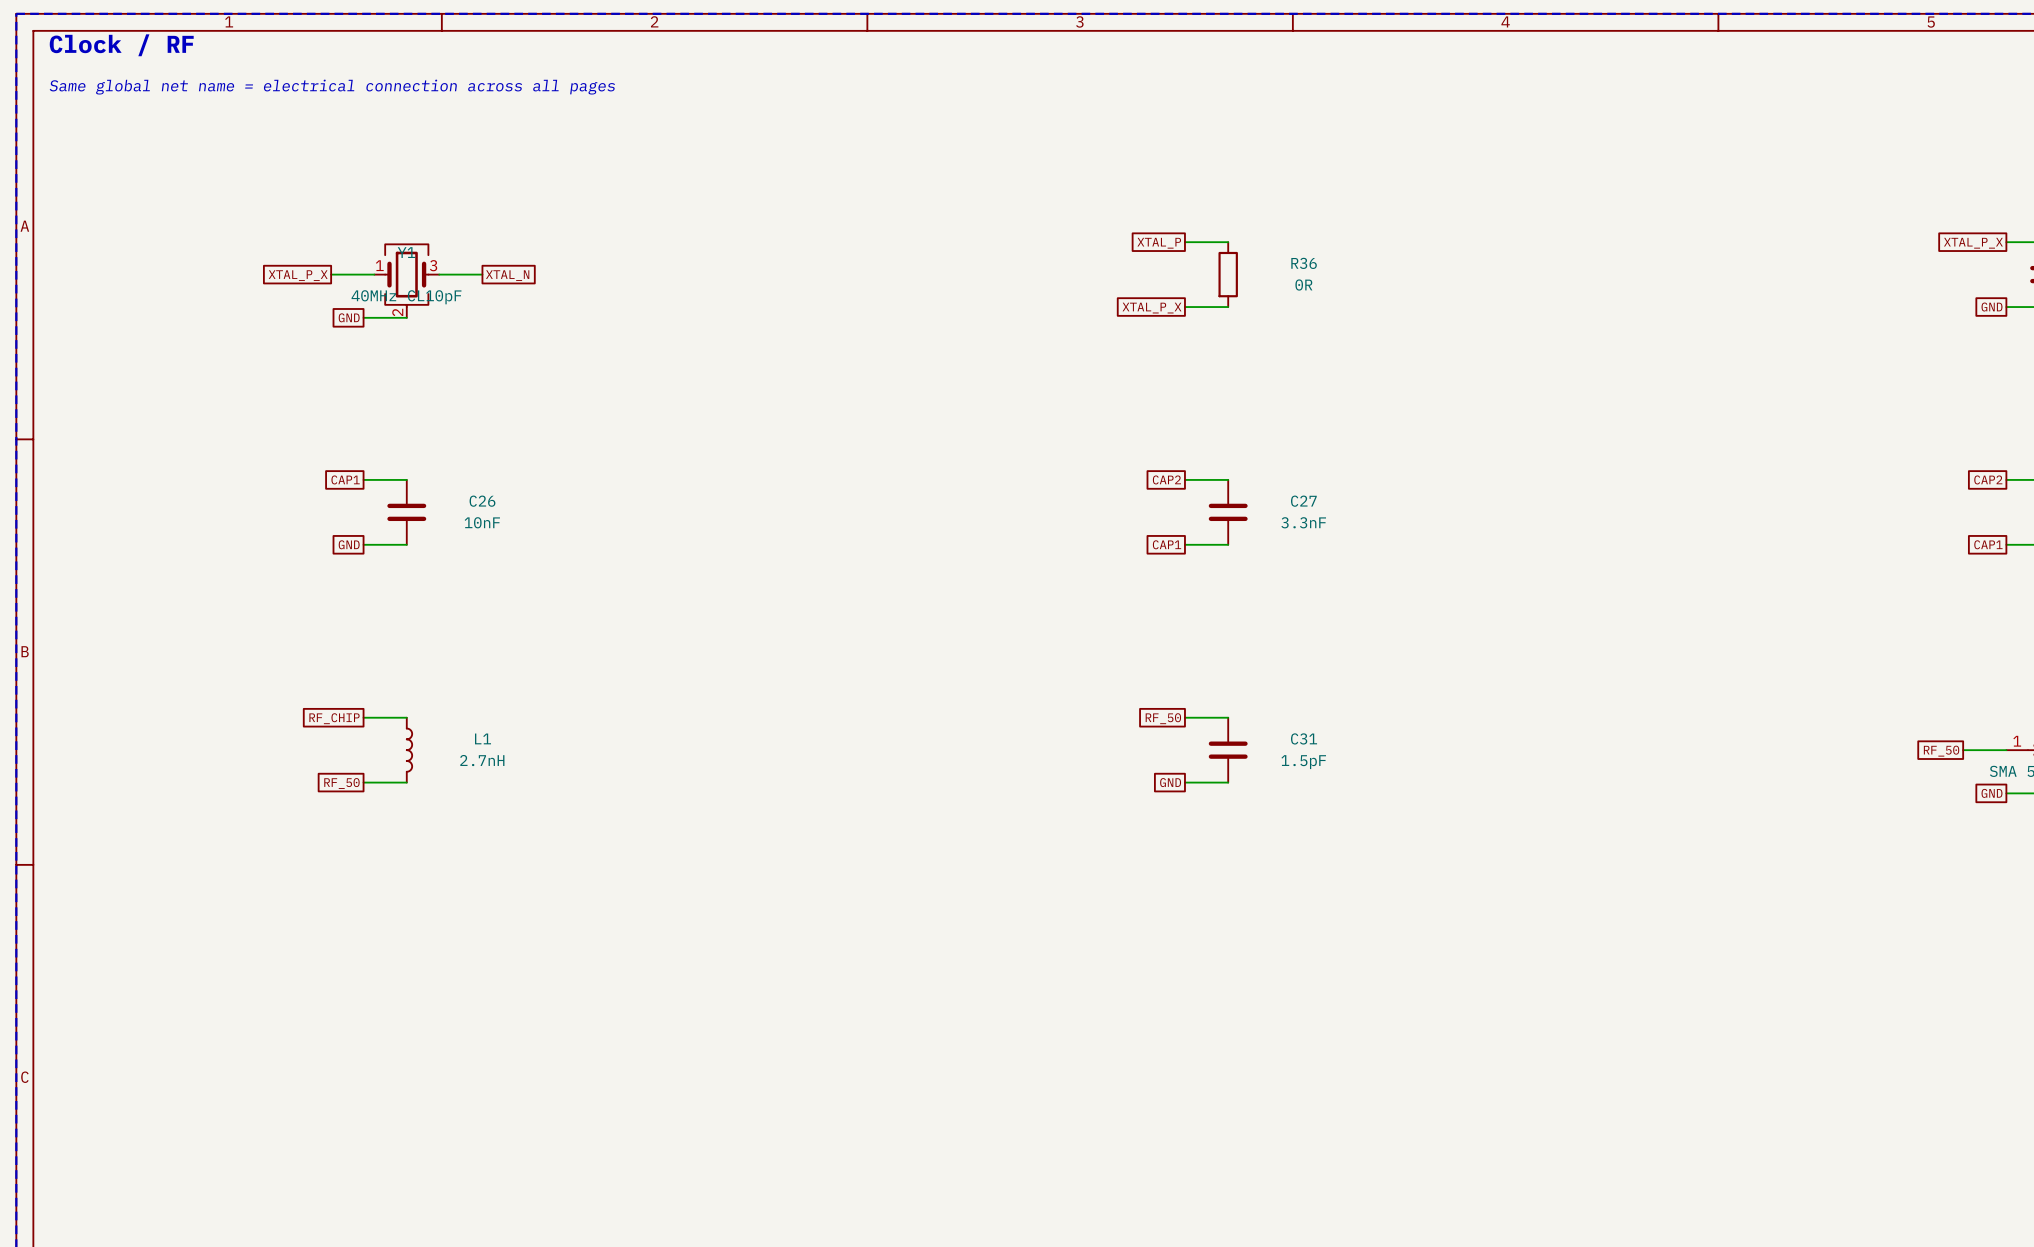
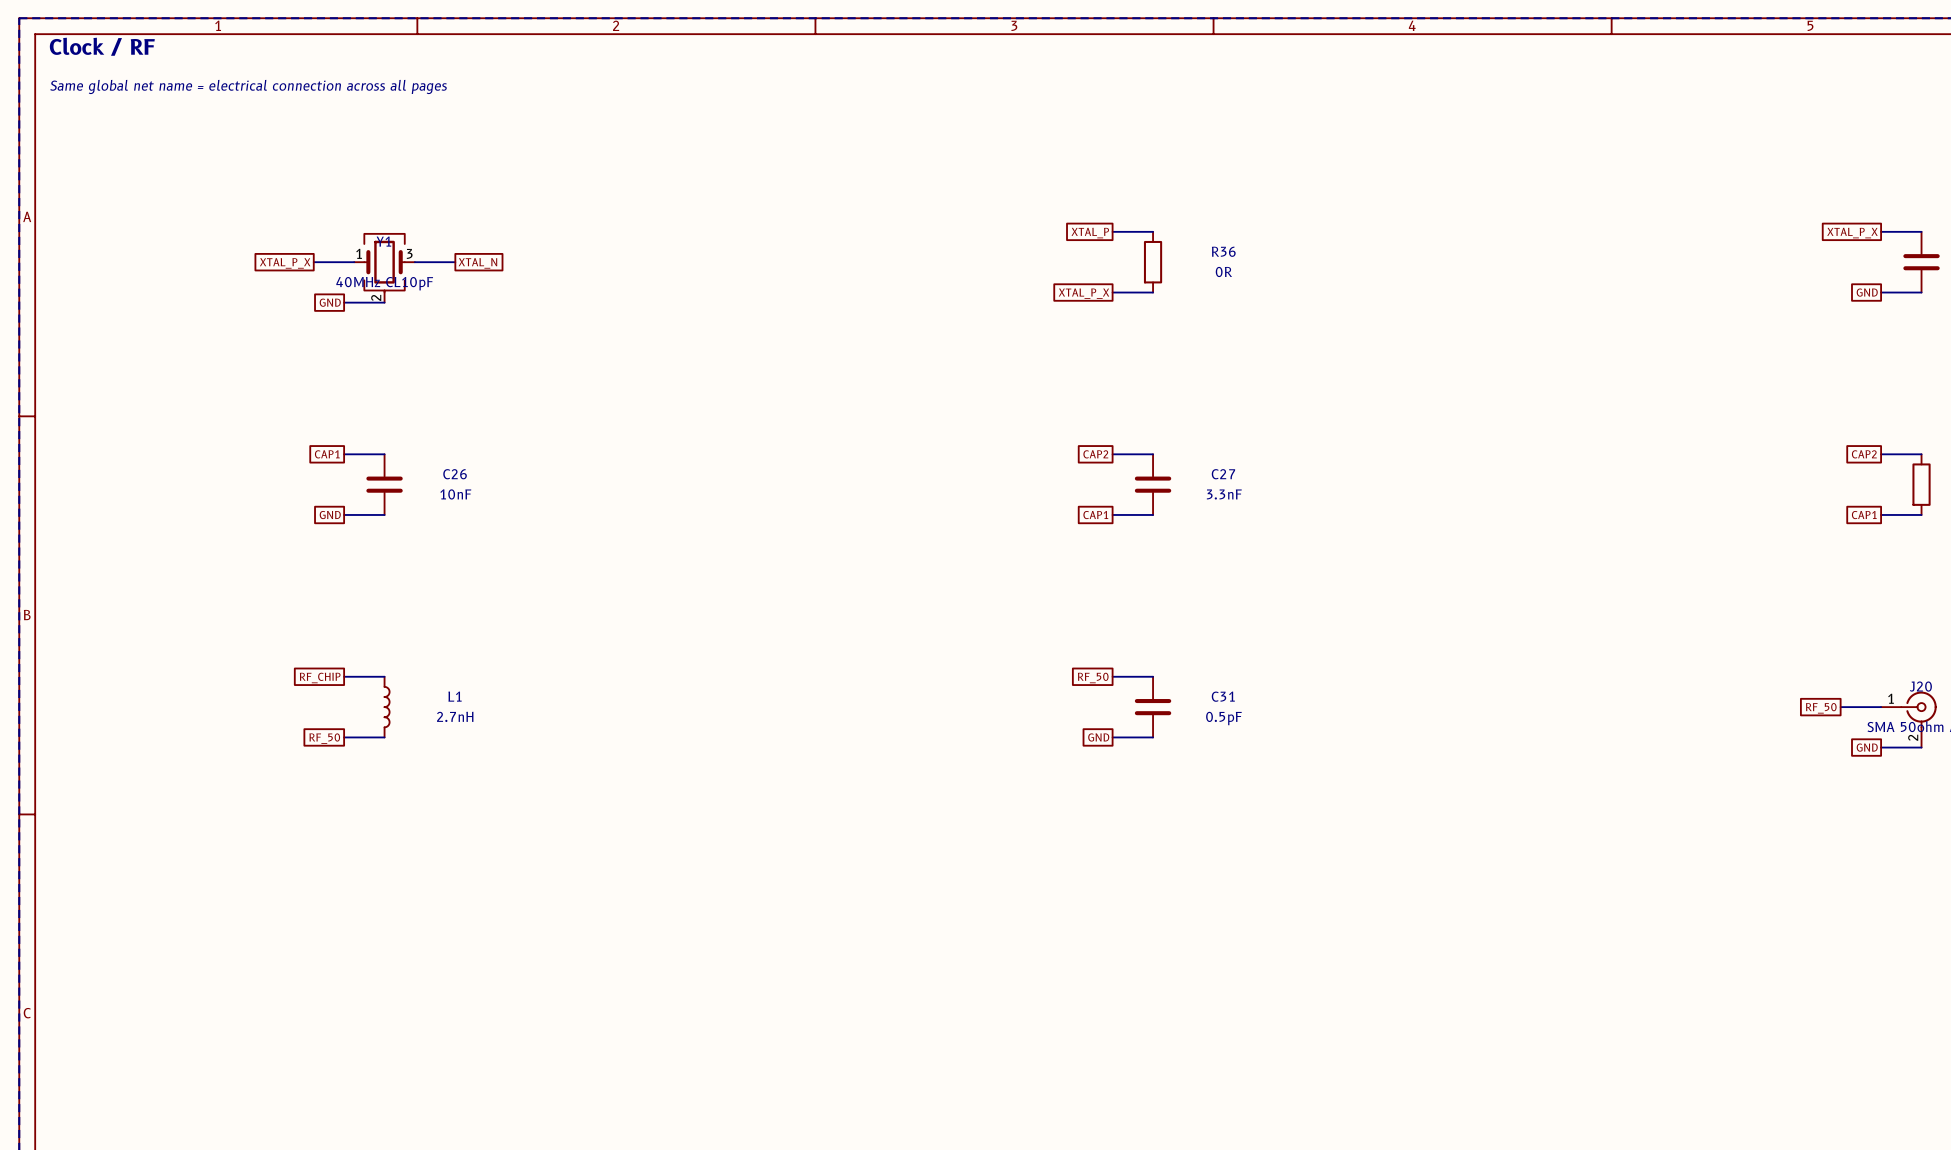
C31 value: 1.5pF (1303, 762) -> 0.5pF (1223, 718)

